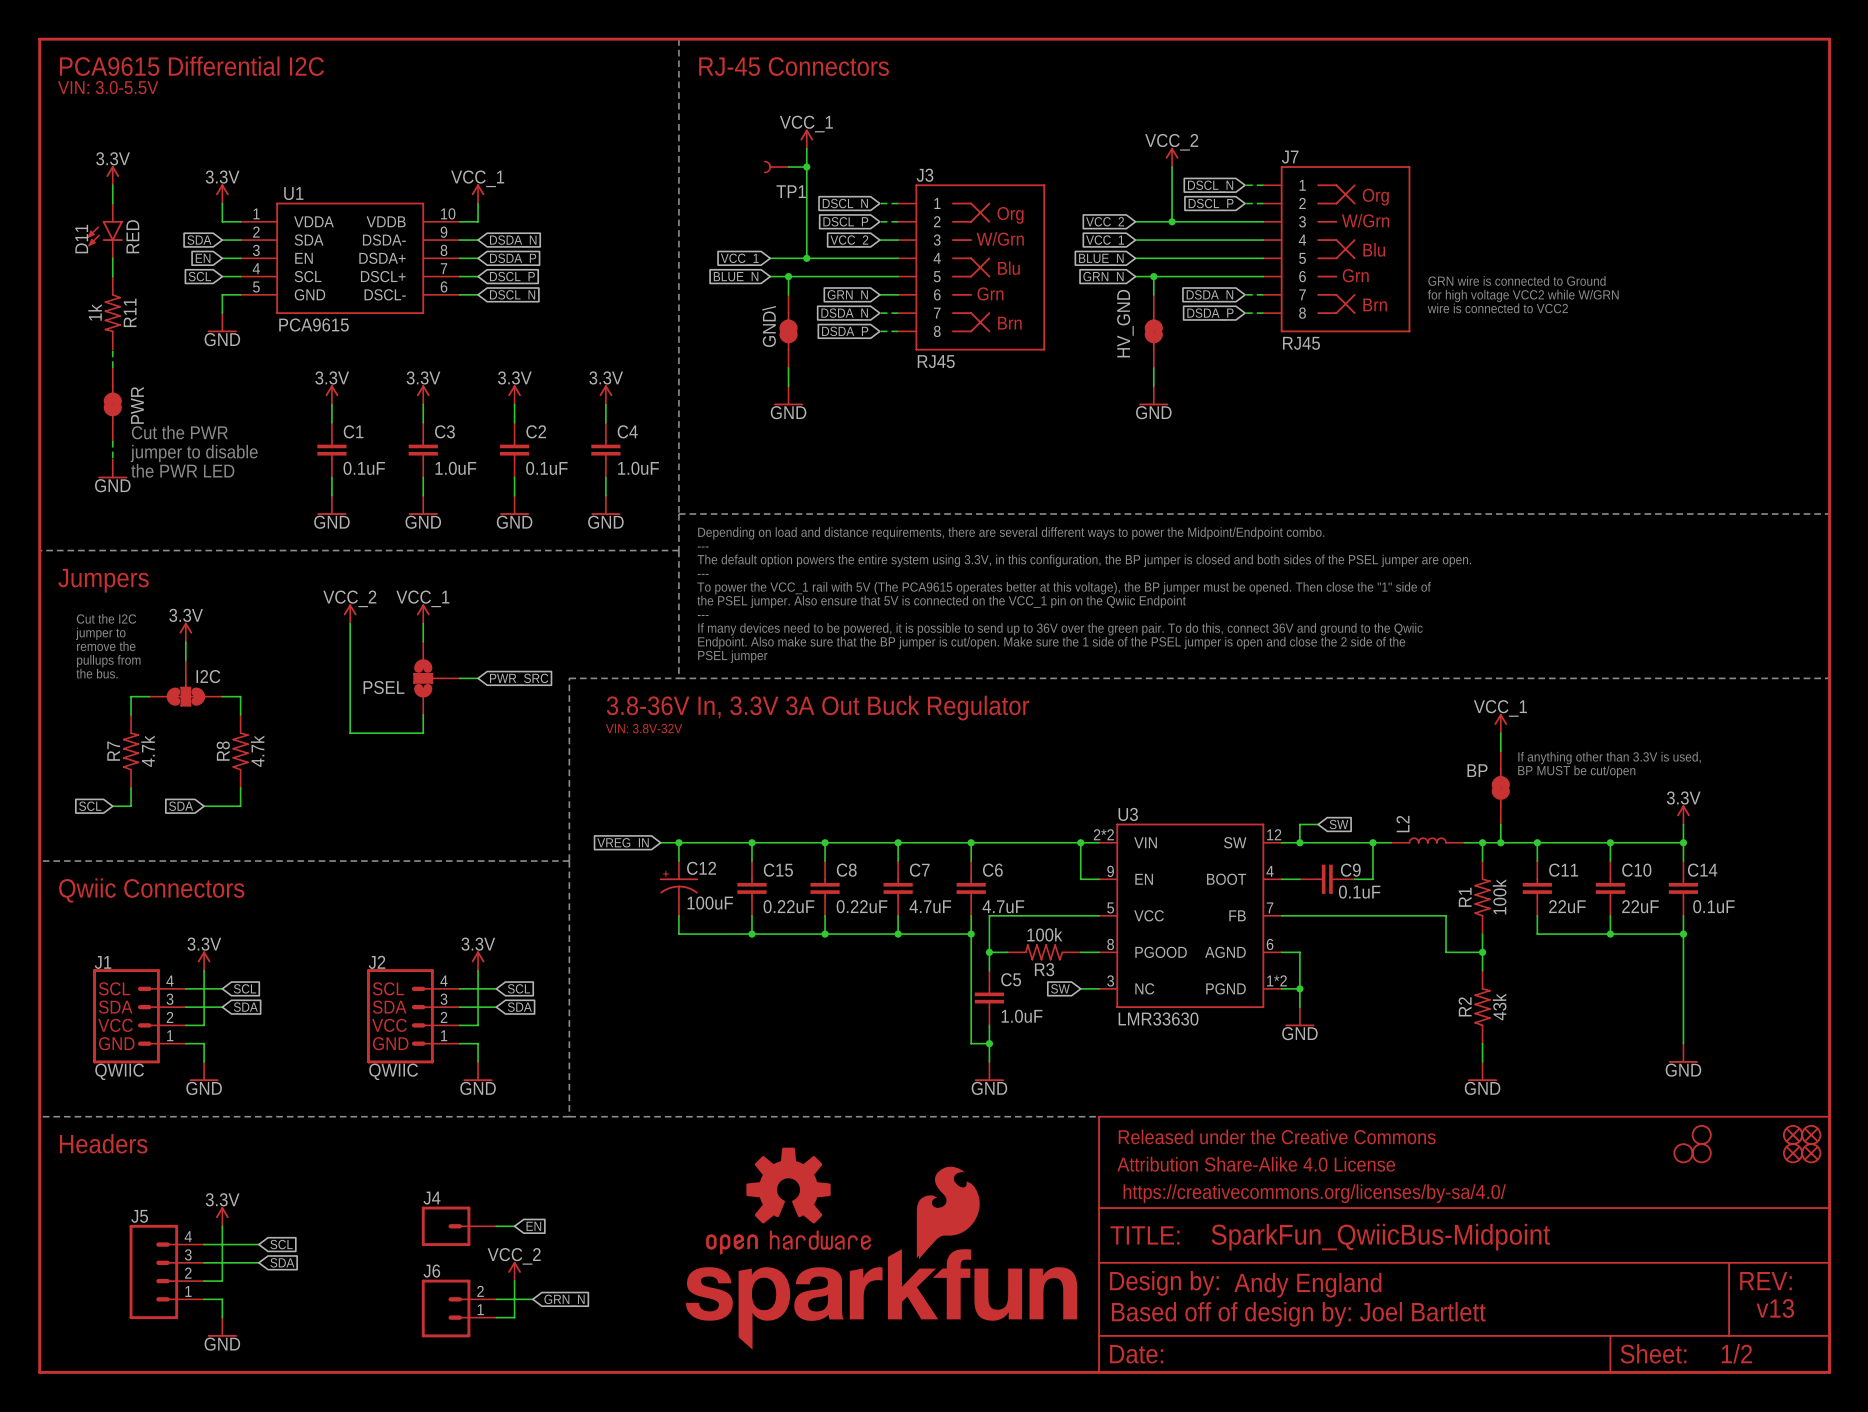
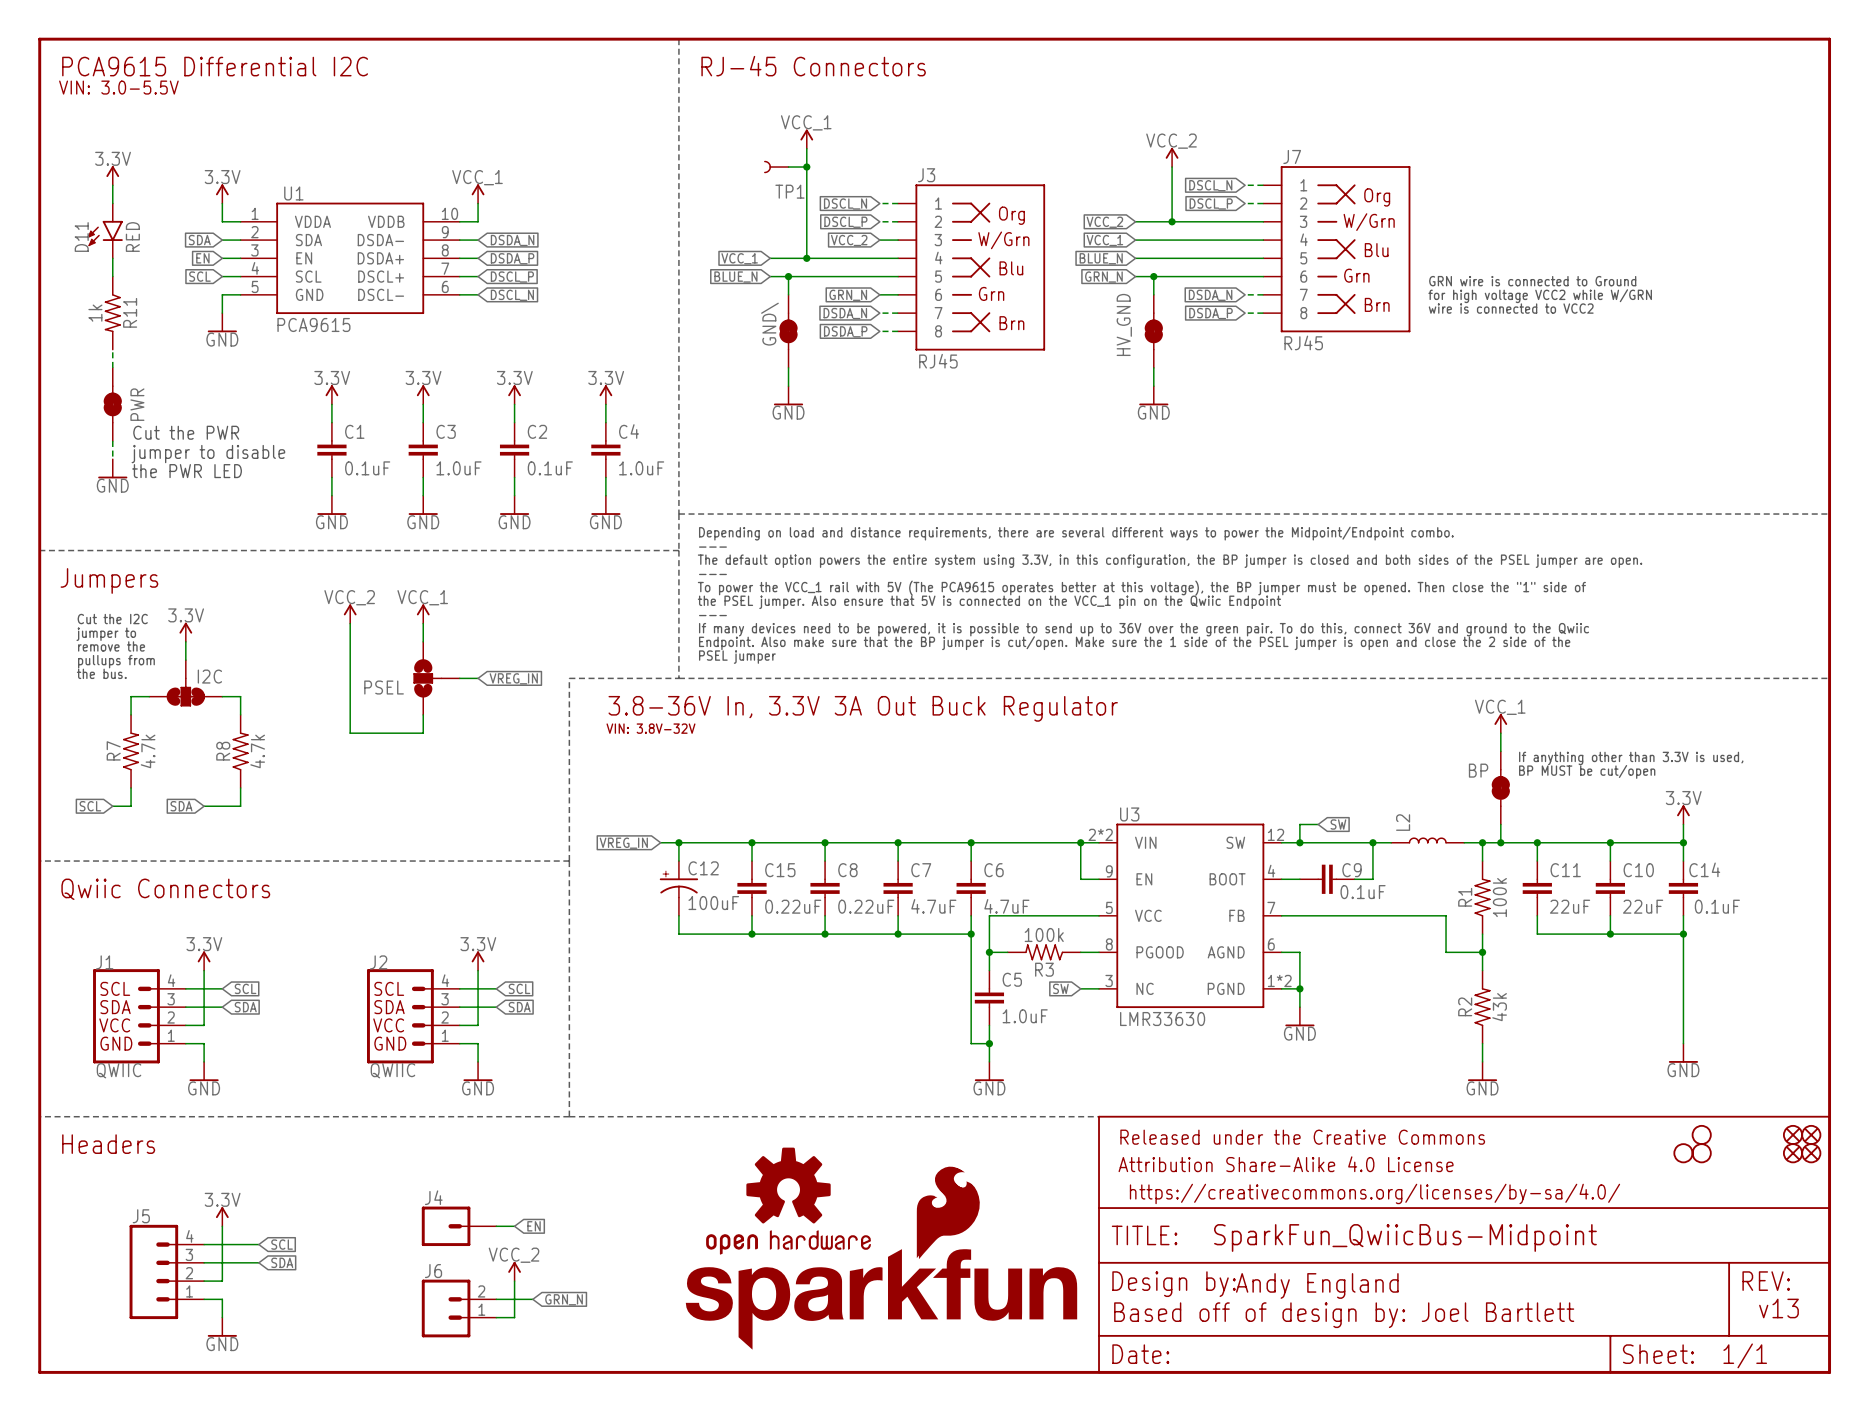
global label: PWR_SRC (519, 679) -> VREG_IN (513, 678)
part text: 1/2 (1736, 1353) -> 1/1 (1745, 1355)

